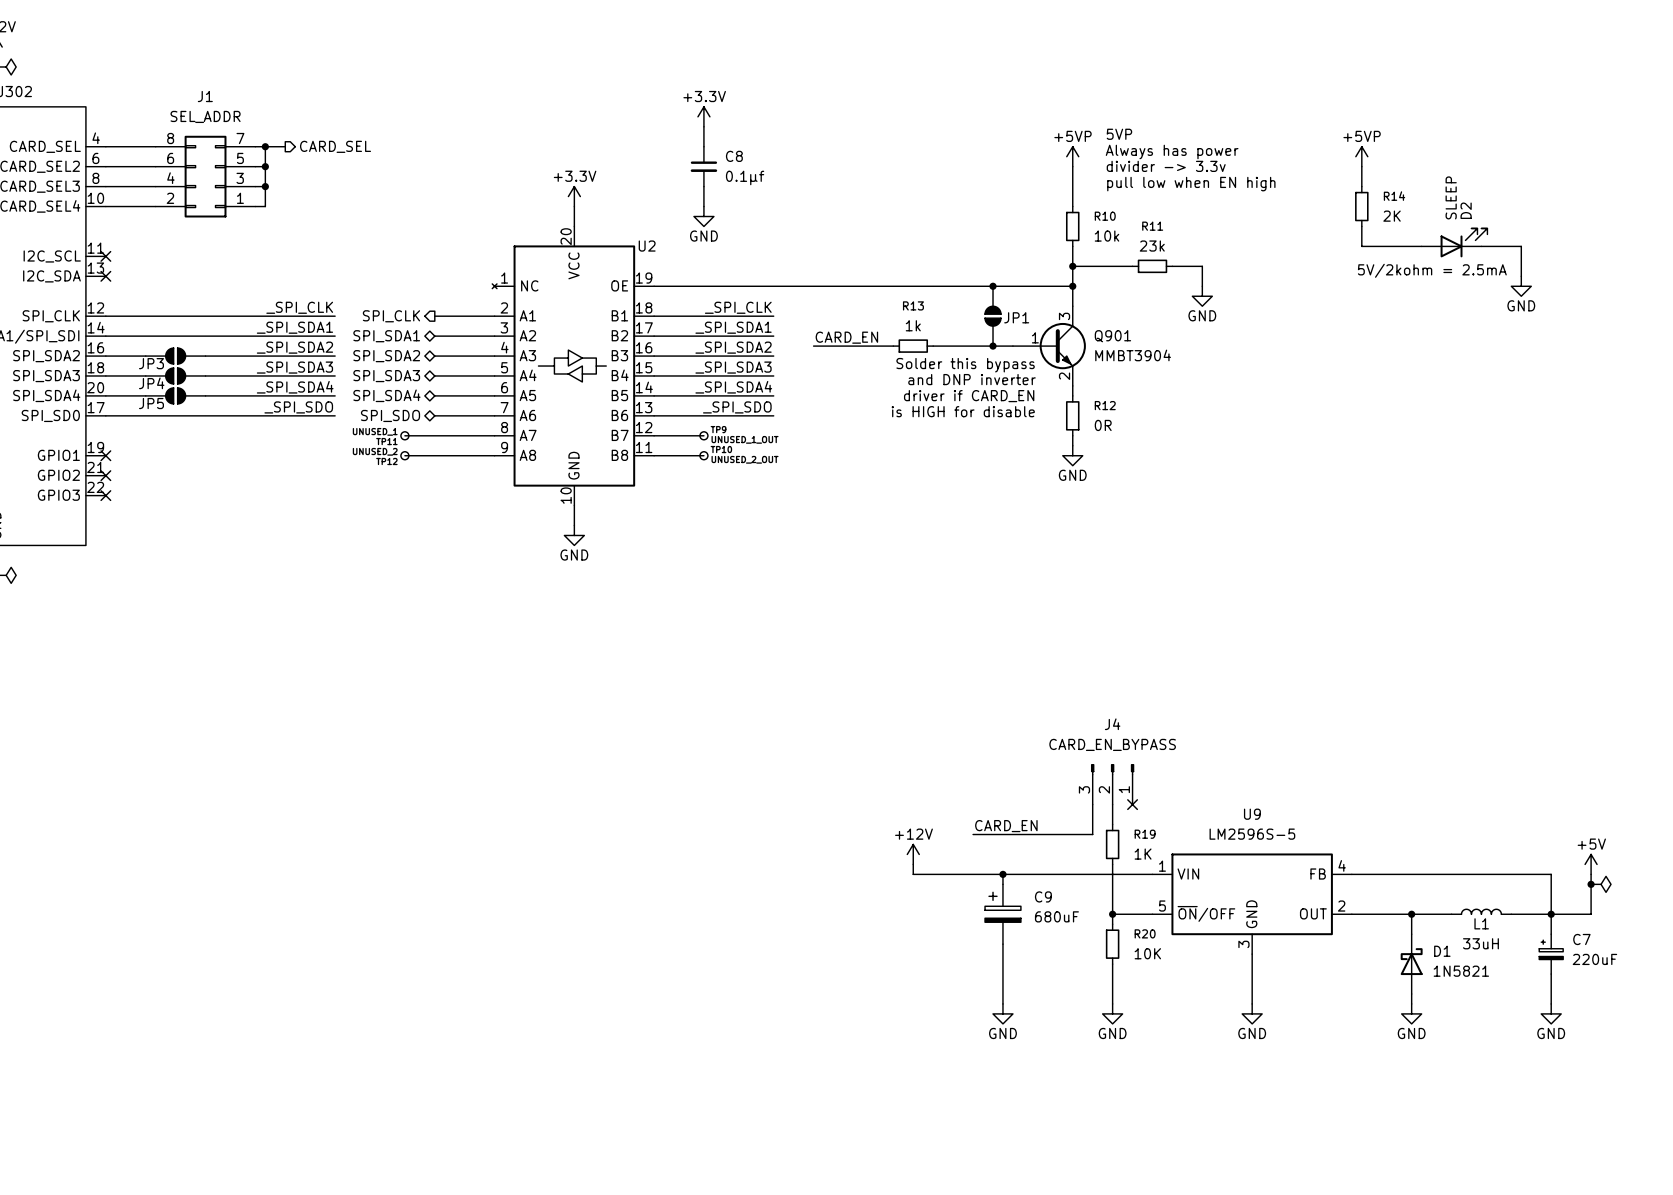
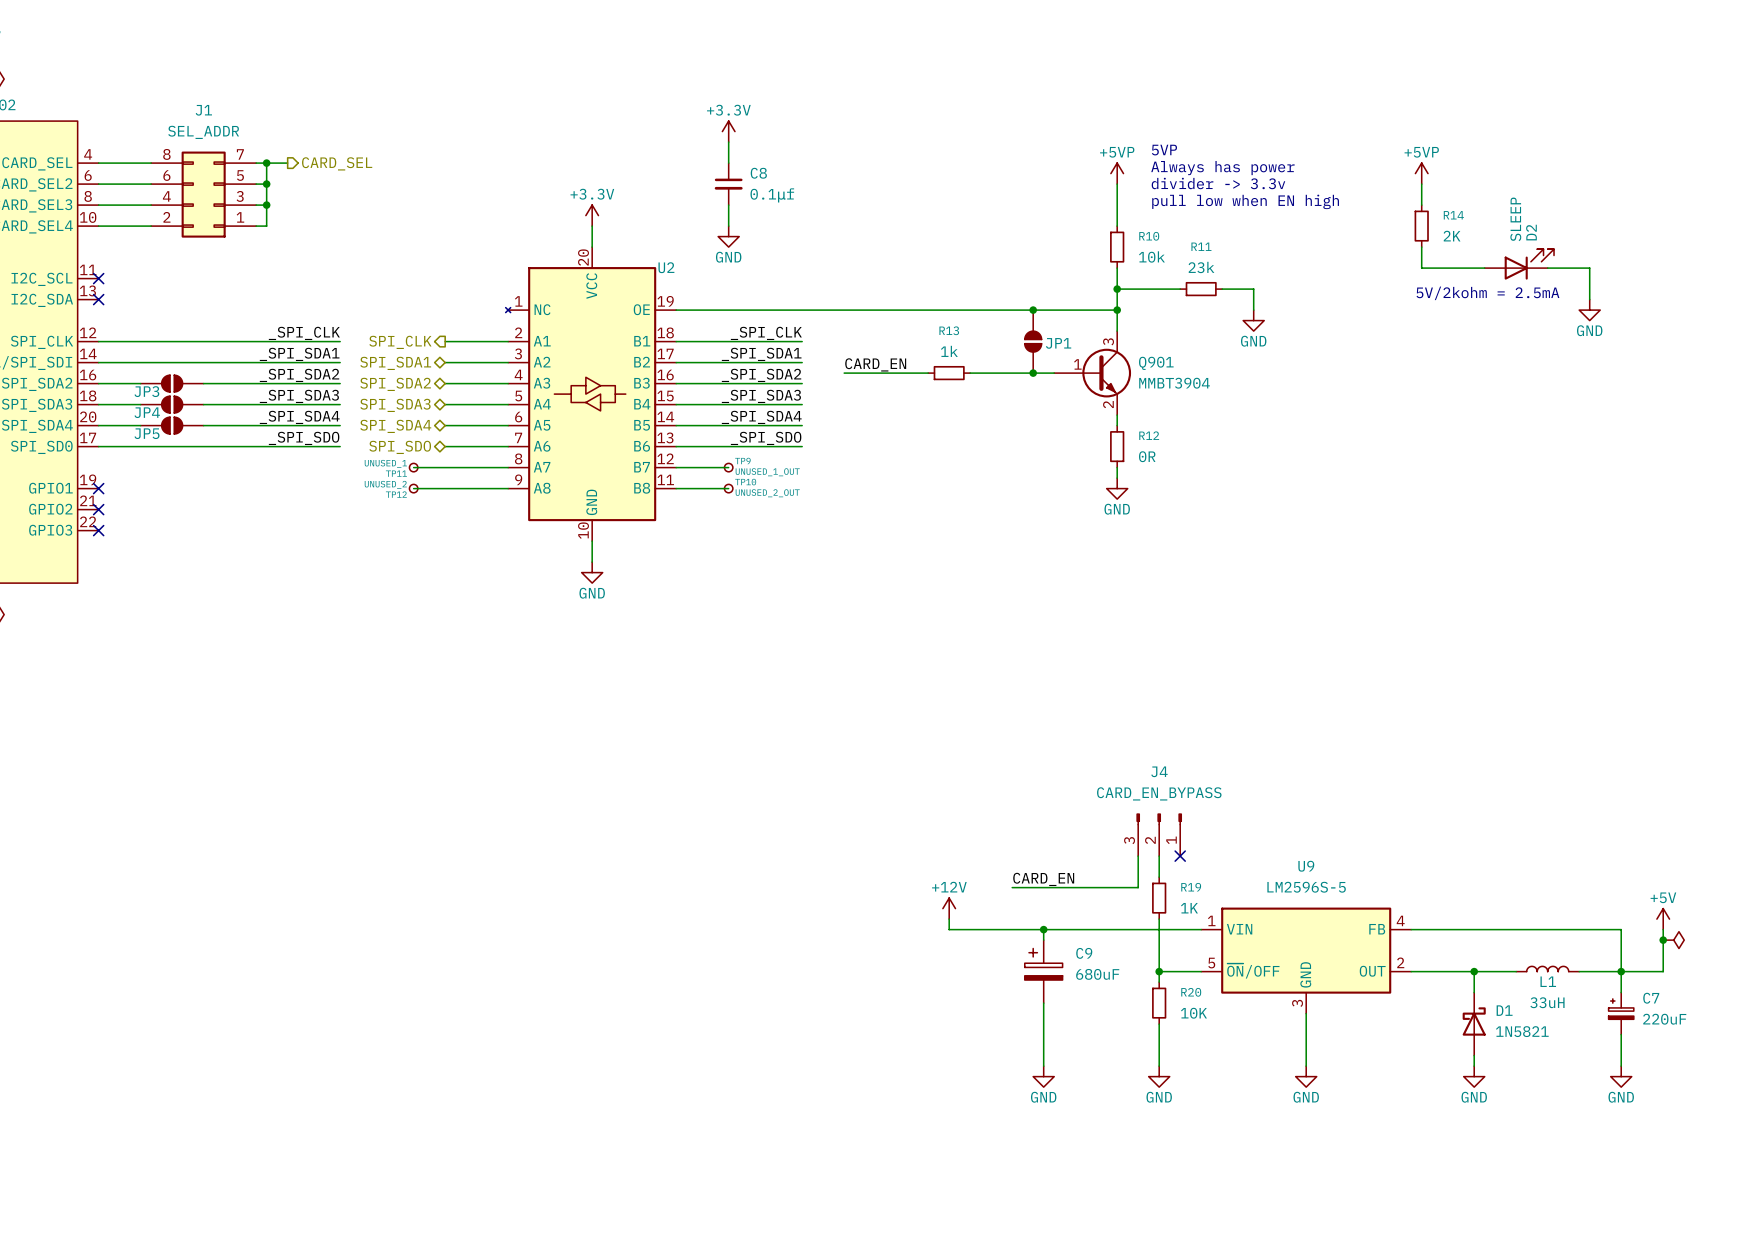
text: Solder this bypass (965, 365) -> none
text: and DNP inverter (972, 379) -> none
text: driver if CARD_EN (969, 396) -> none
text: is HIGH for disable (963, 411) -> none

